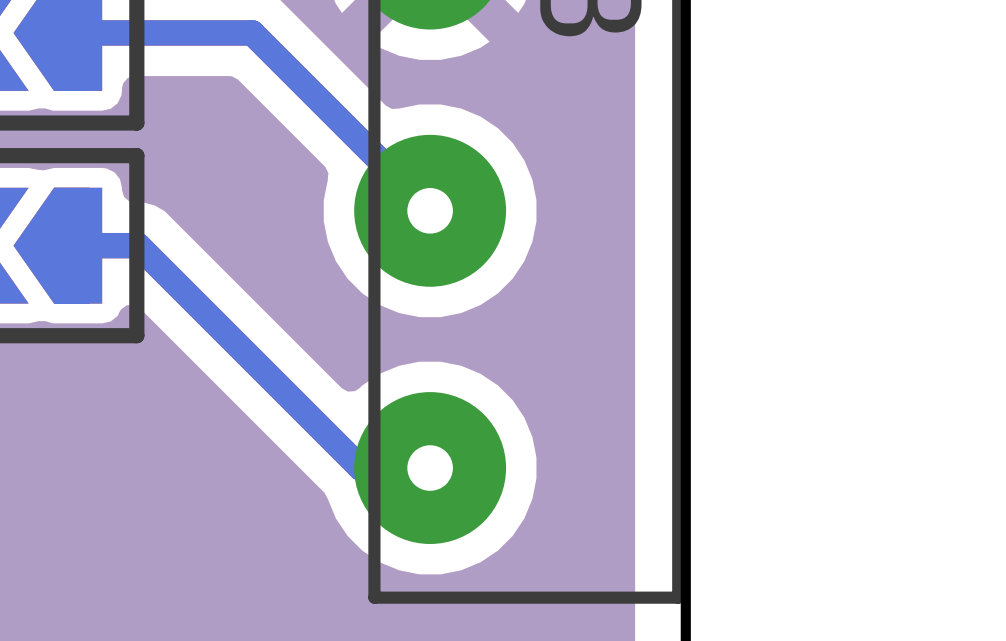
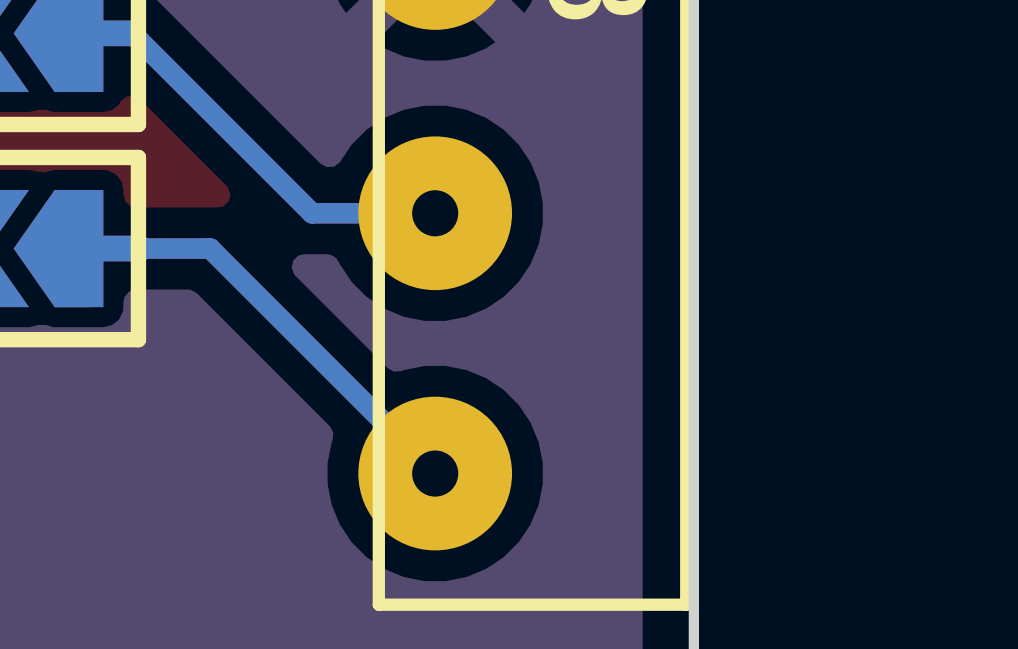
bottom track: (130, 32) (252, 32) (430, 210) -> (132, 33) (312, 213) (435, 213)
bottom track: (138, 245) (360, 468) (430, 468) -> (139, 248) (210, 248) (435, 473)

